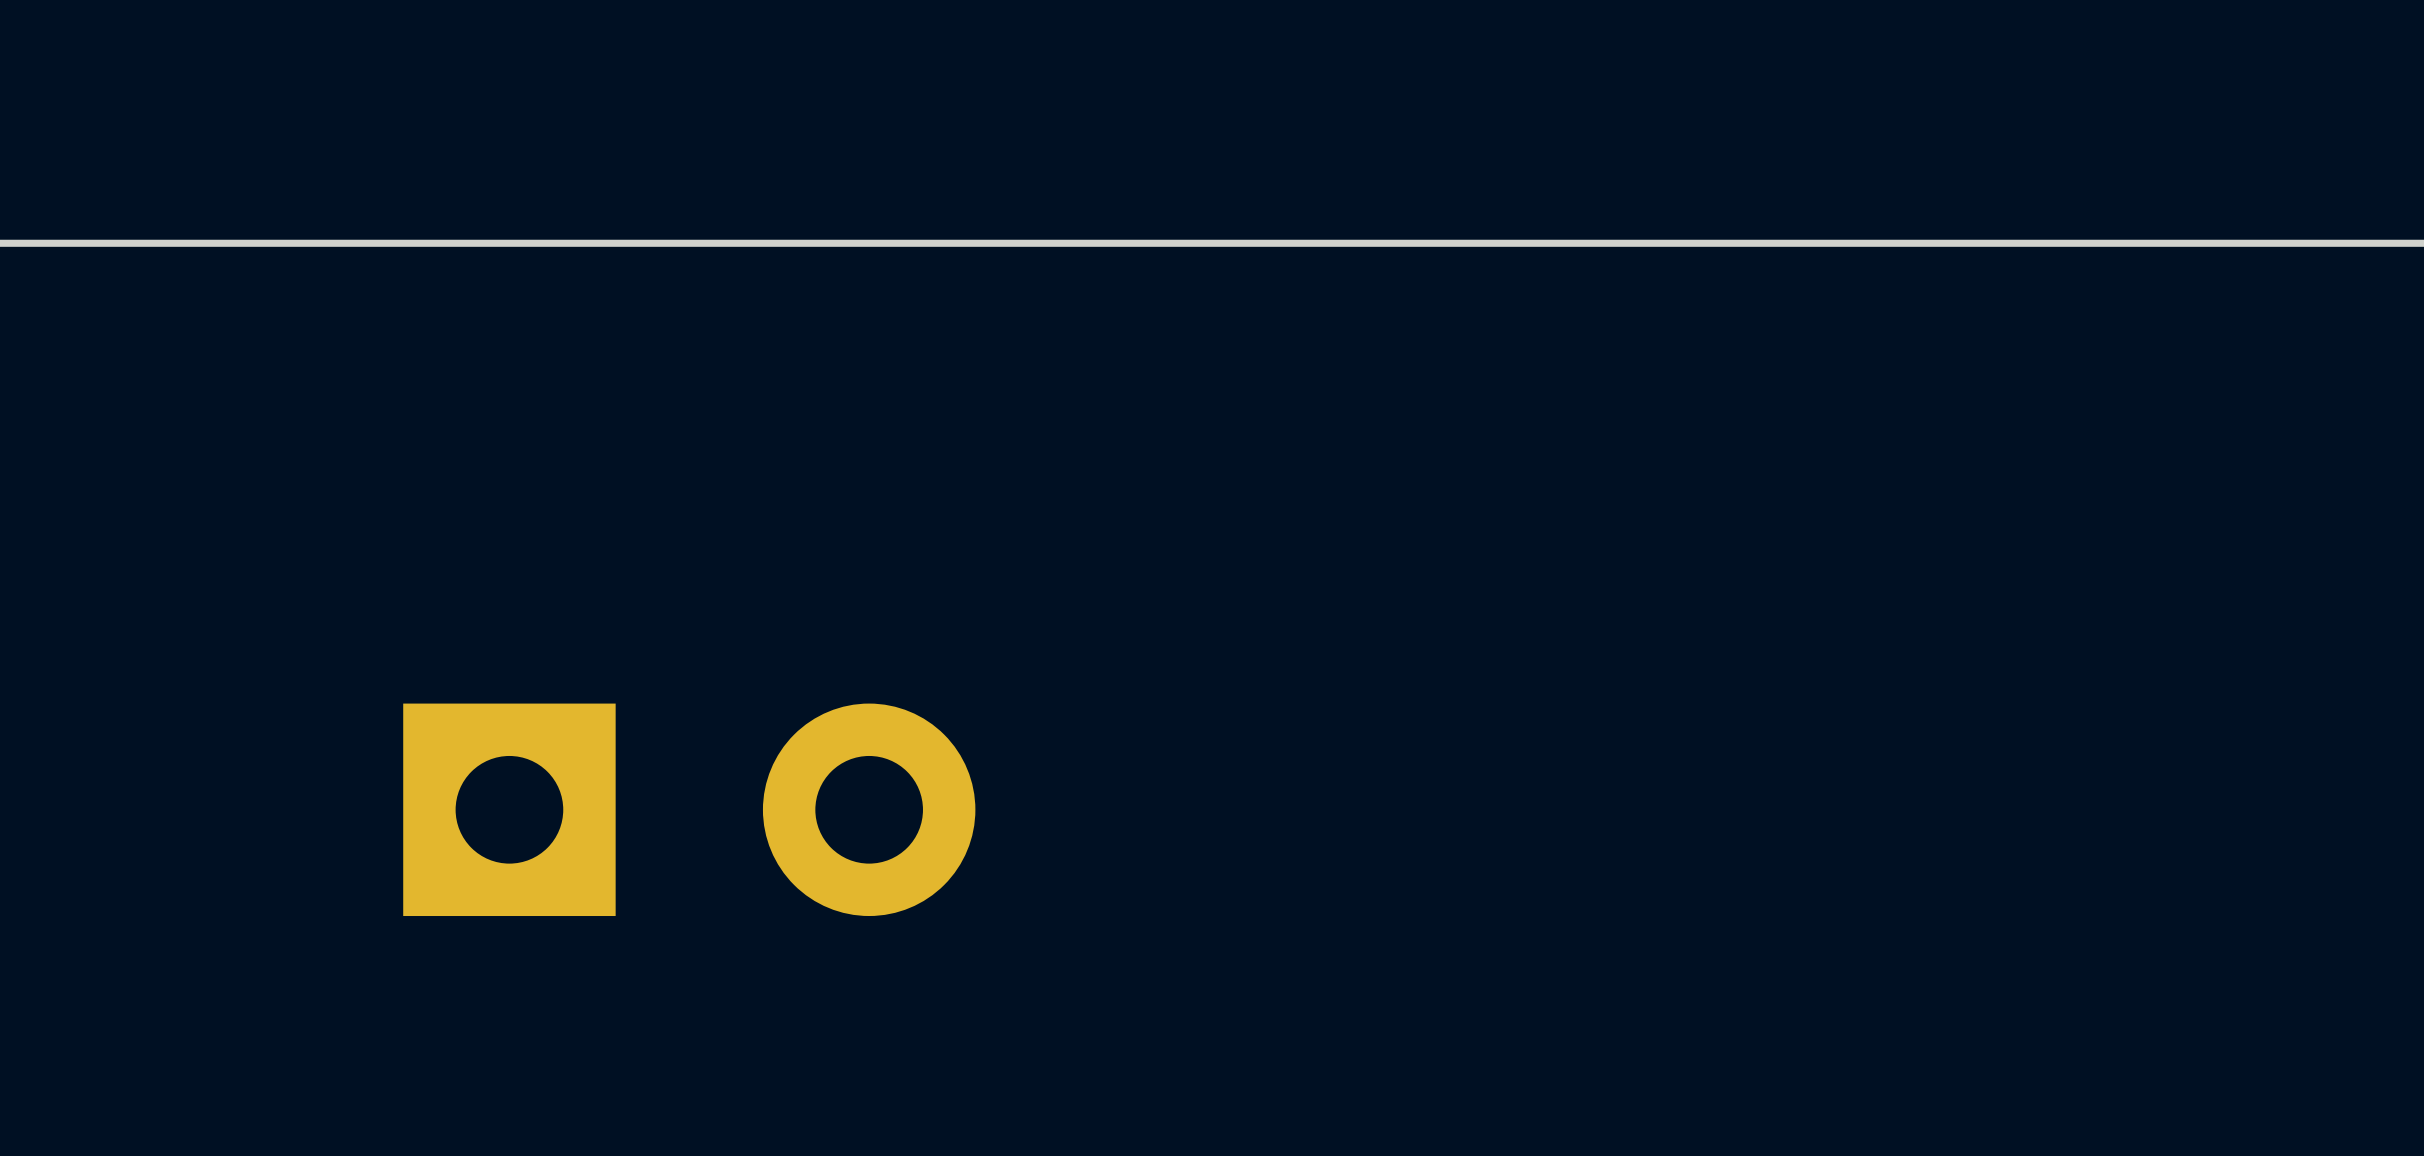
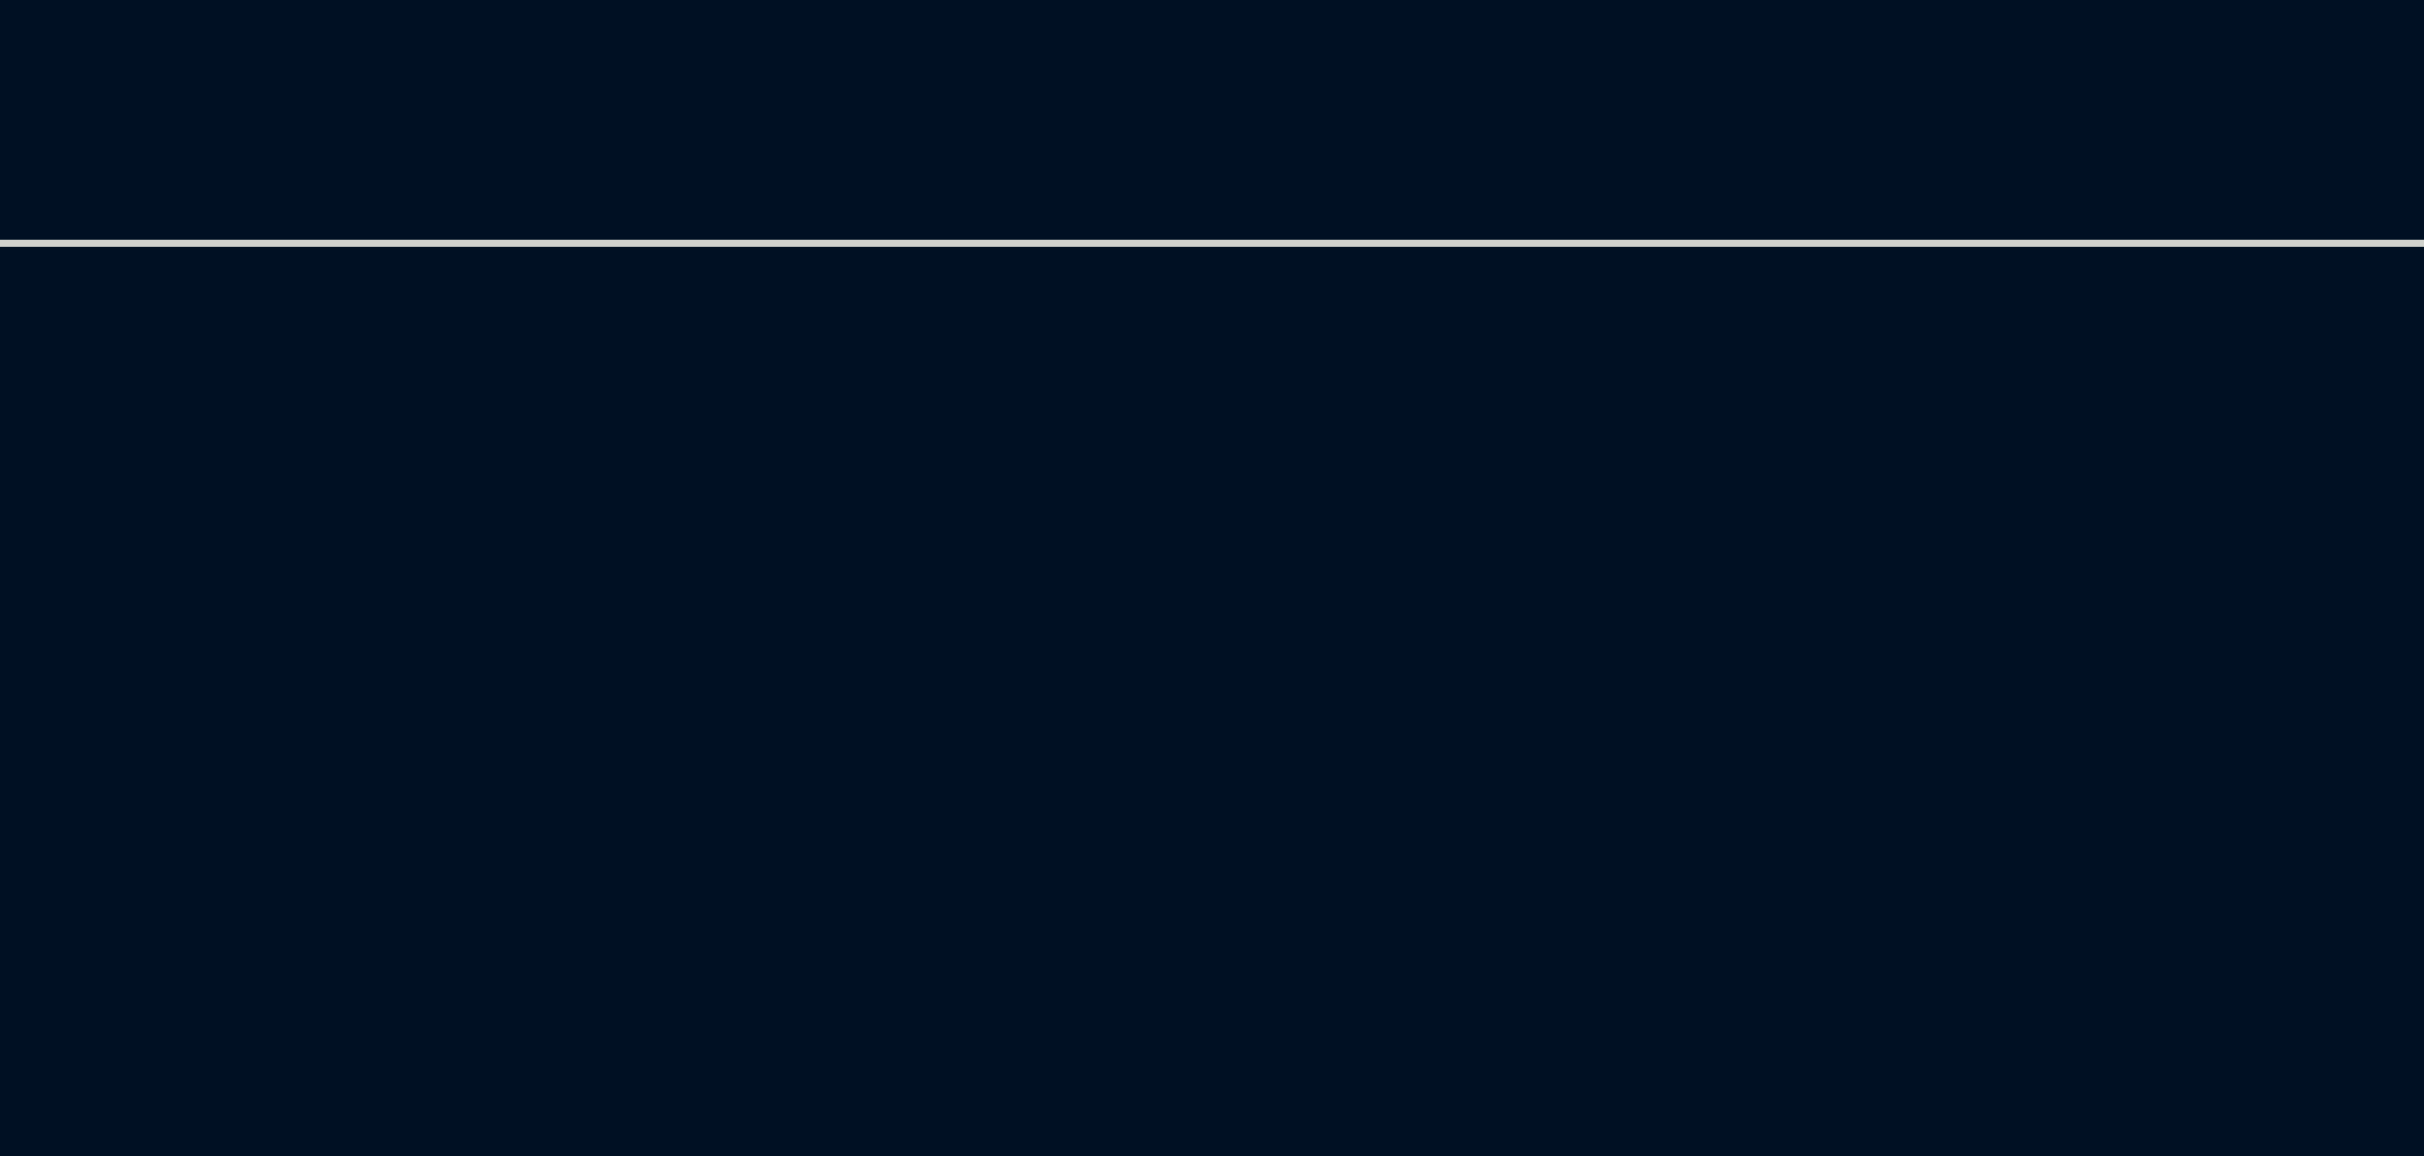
part: (689, 809) -> none

